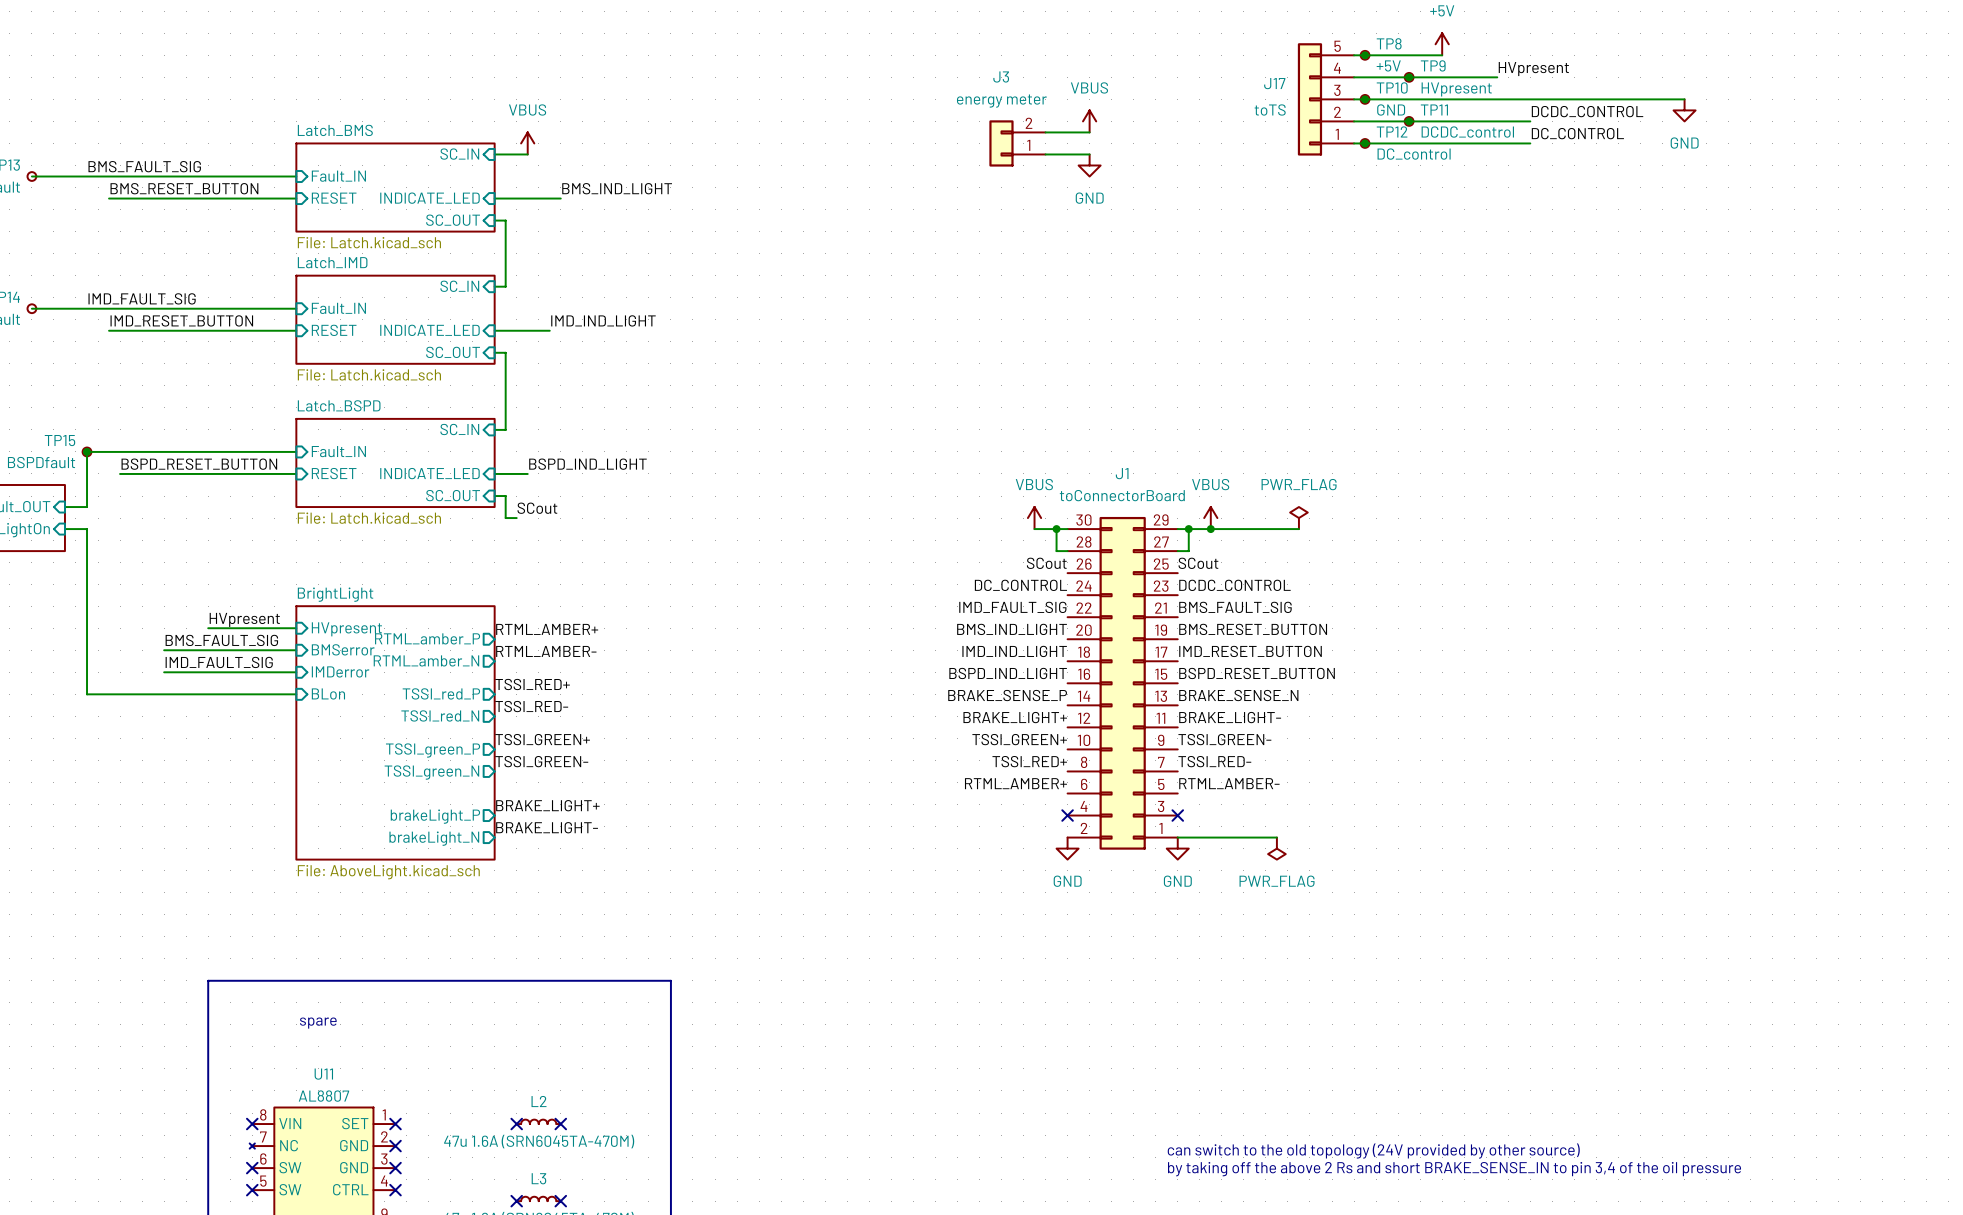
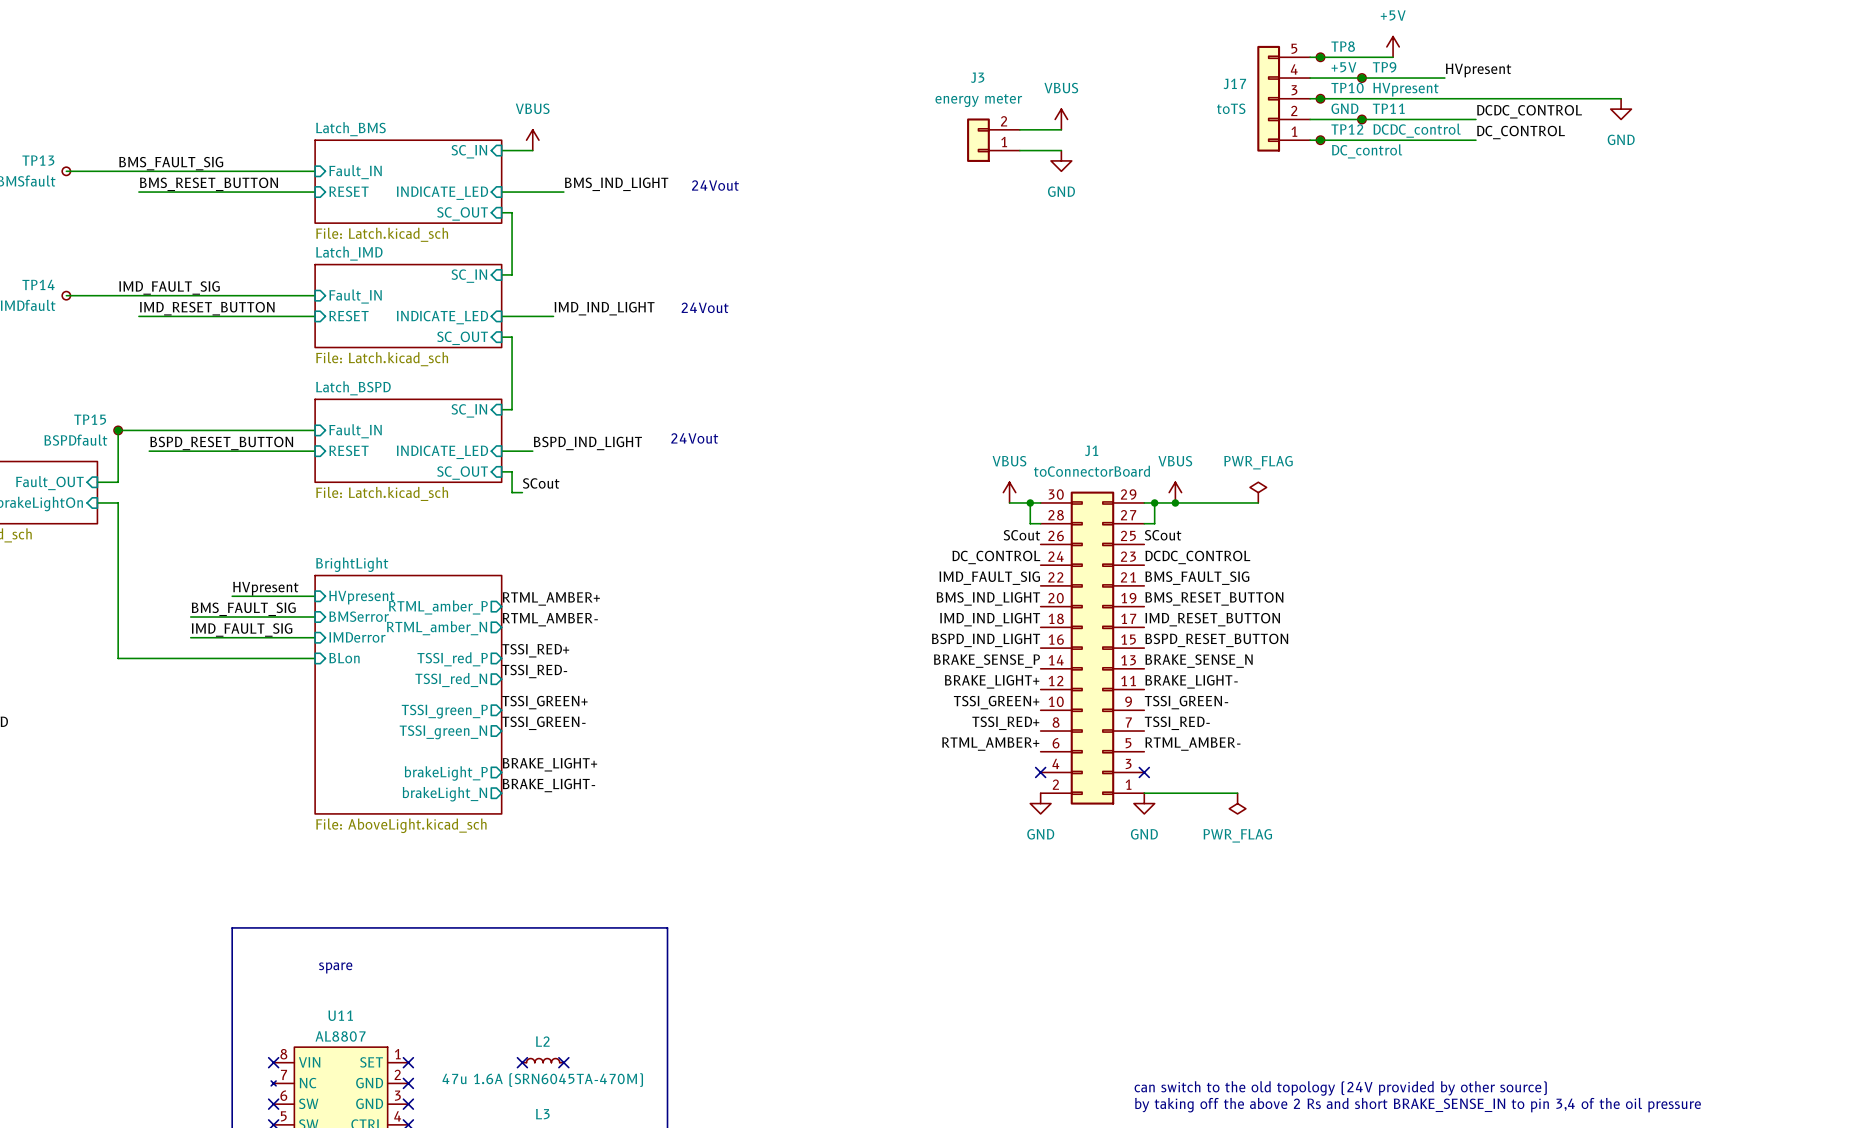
text: none -> 24Vout (715, 185)
text: none -> 24Vout (705, 307)
text: none -> 24Vout (694, 438)

